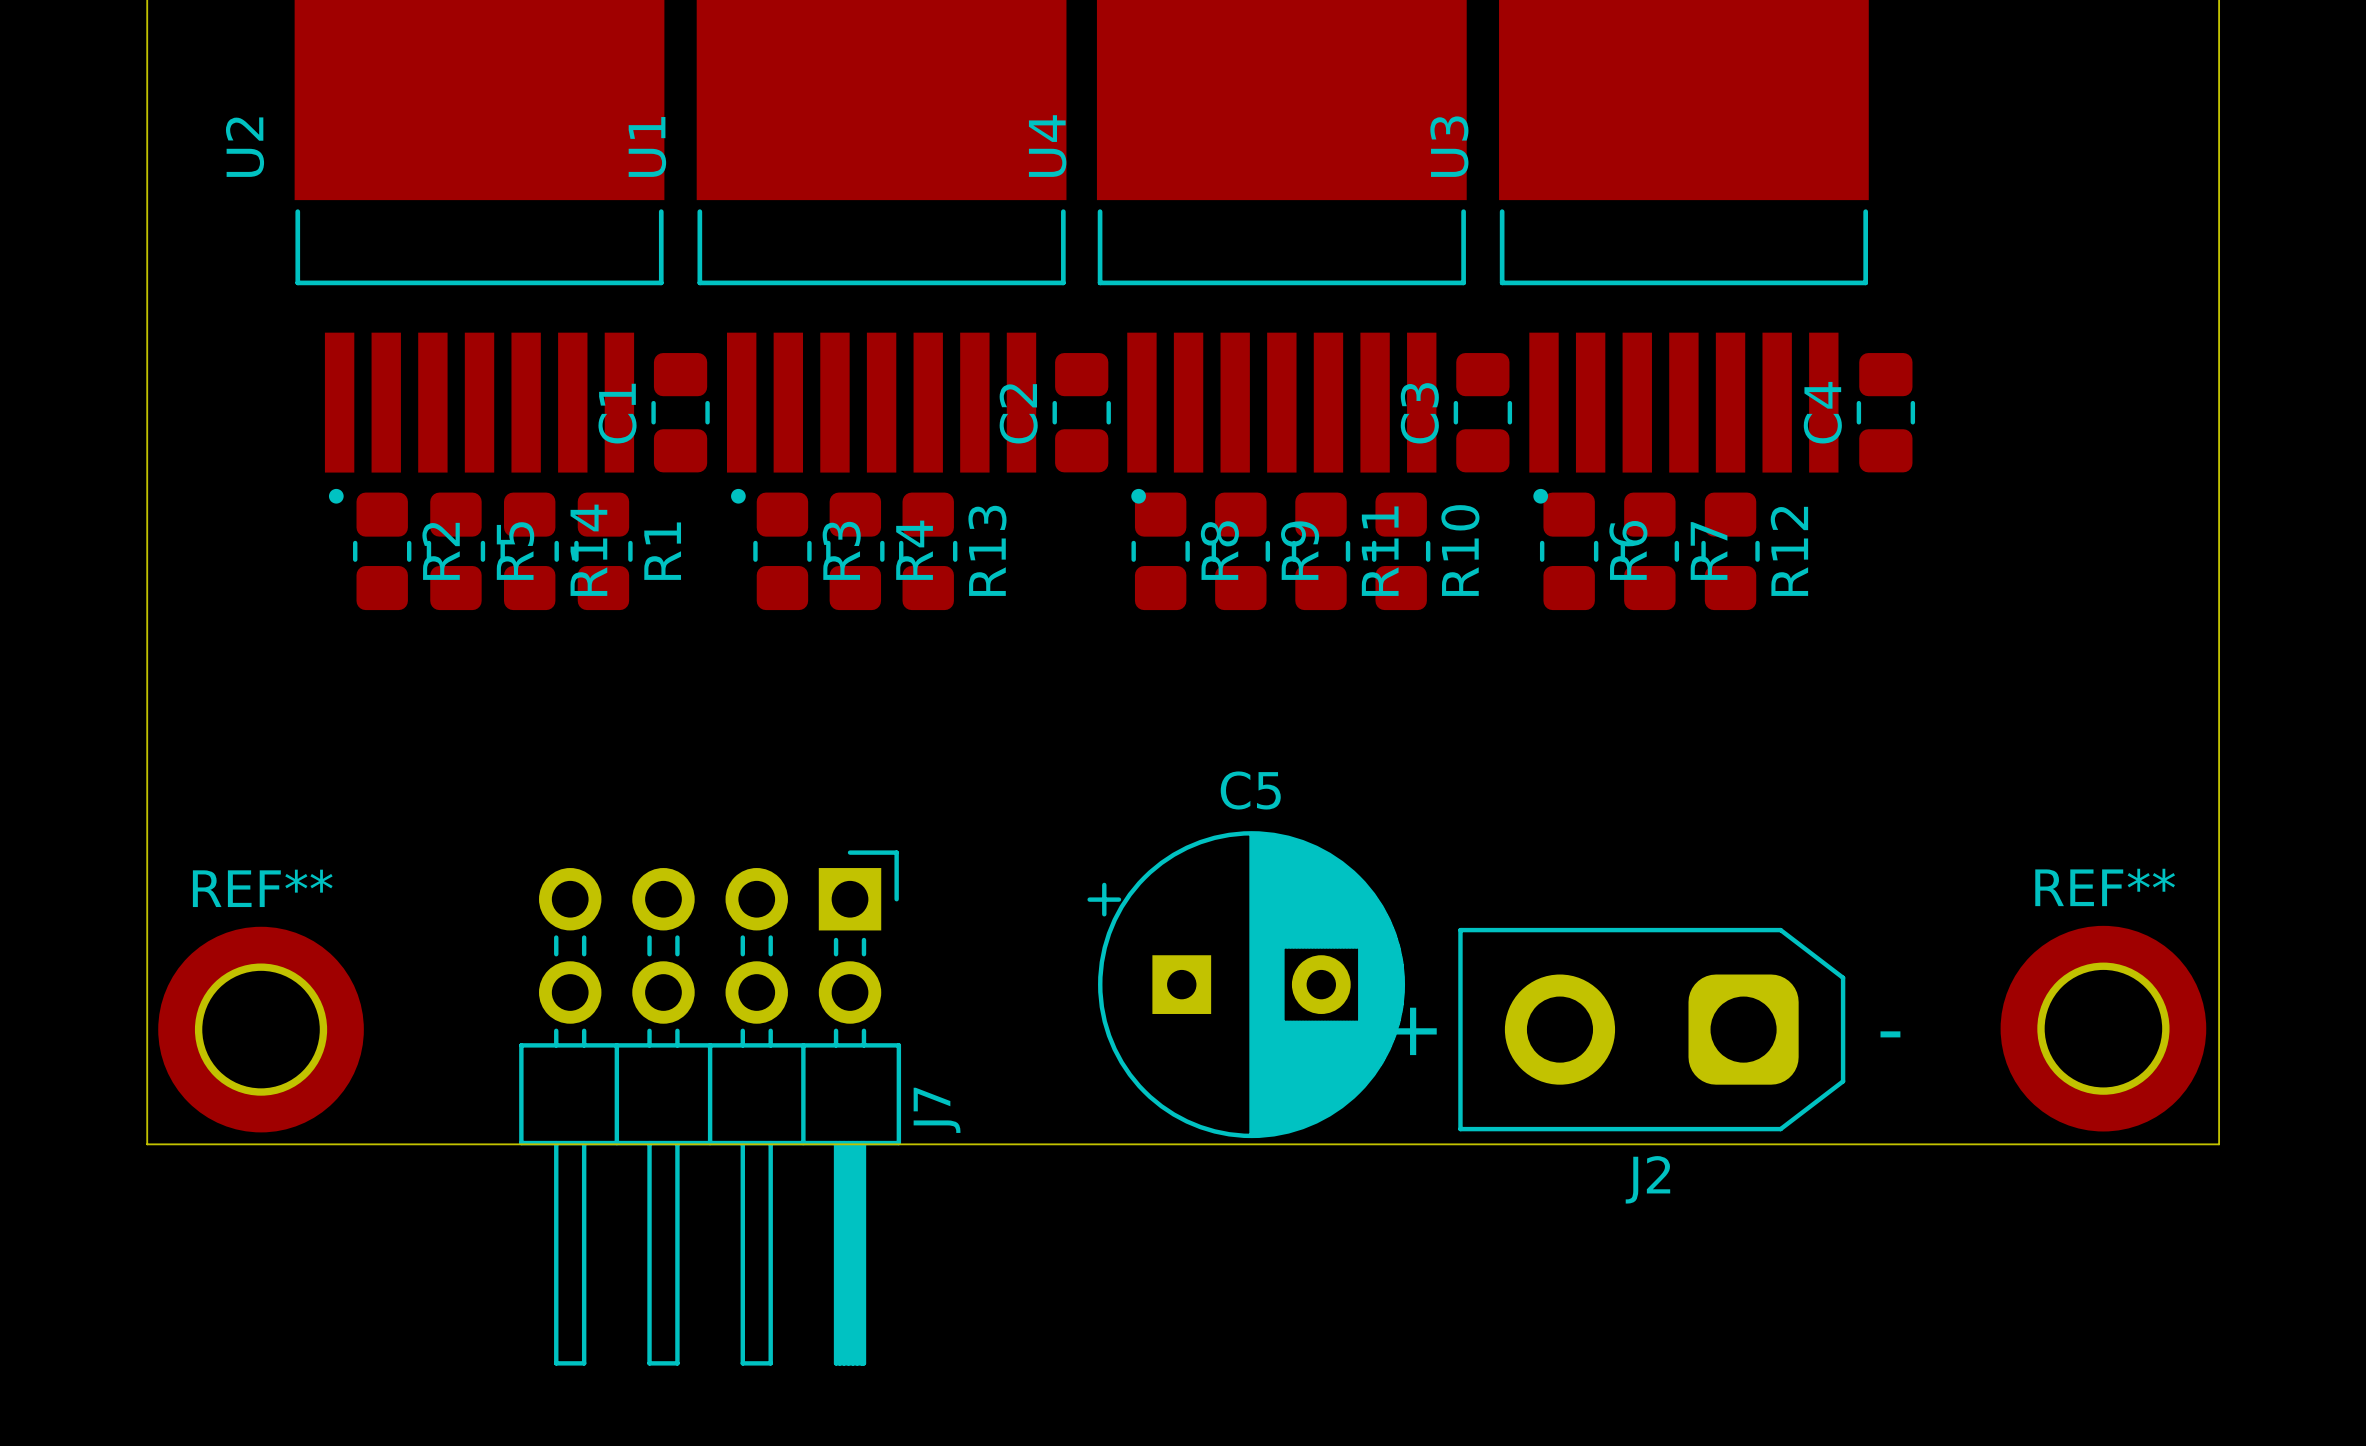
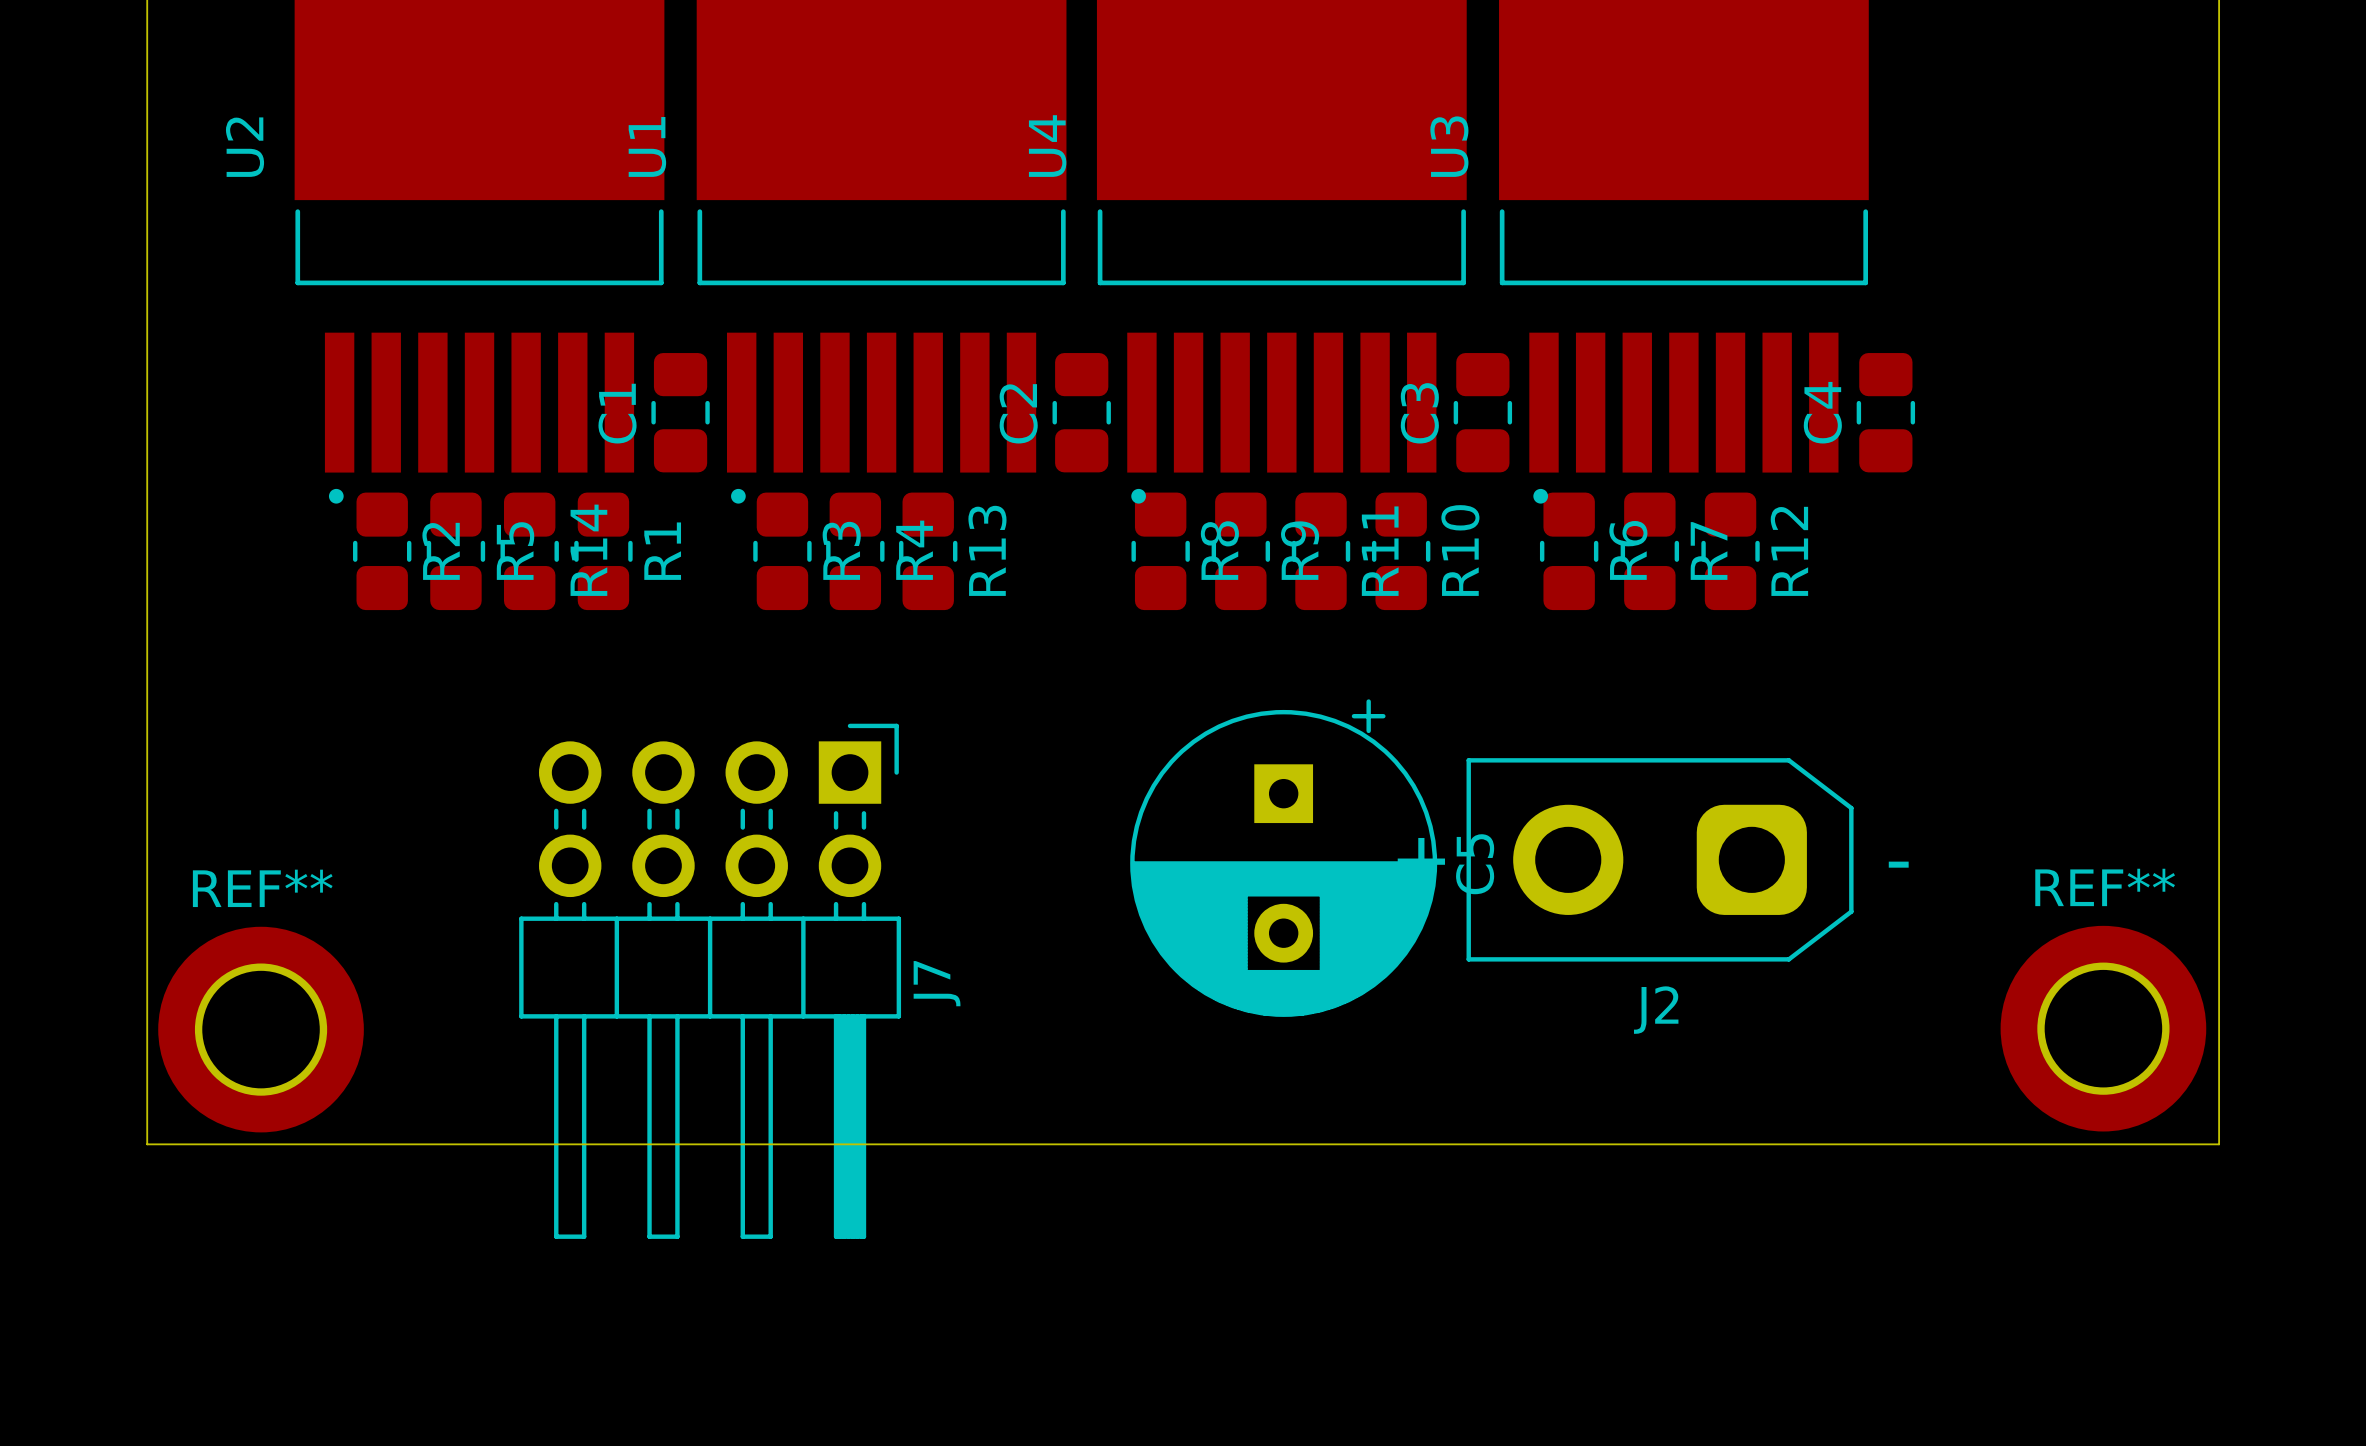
C5 rotation: 0° (1246, 984) -> 90° clockwise (1283, 858)
J2 position: (1651, 1029) -> (1660, 859)
J7 position: (710, 1107) -> (710, 981)

